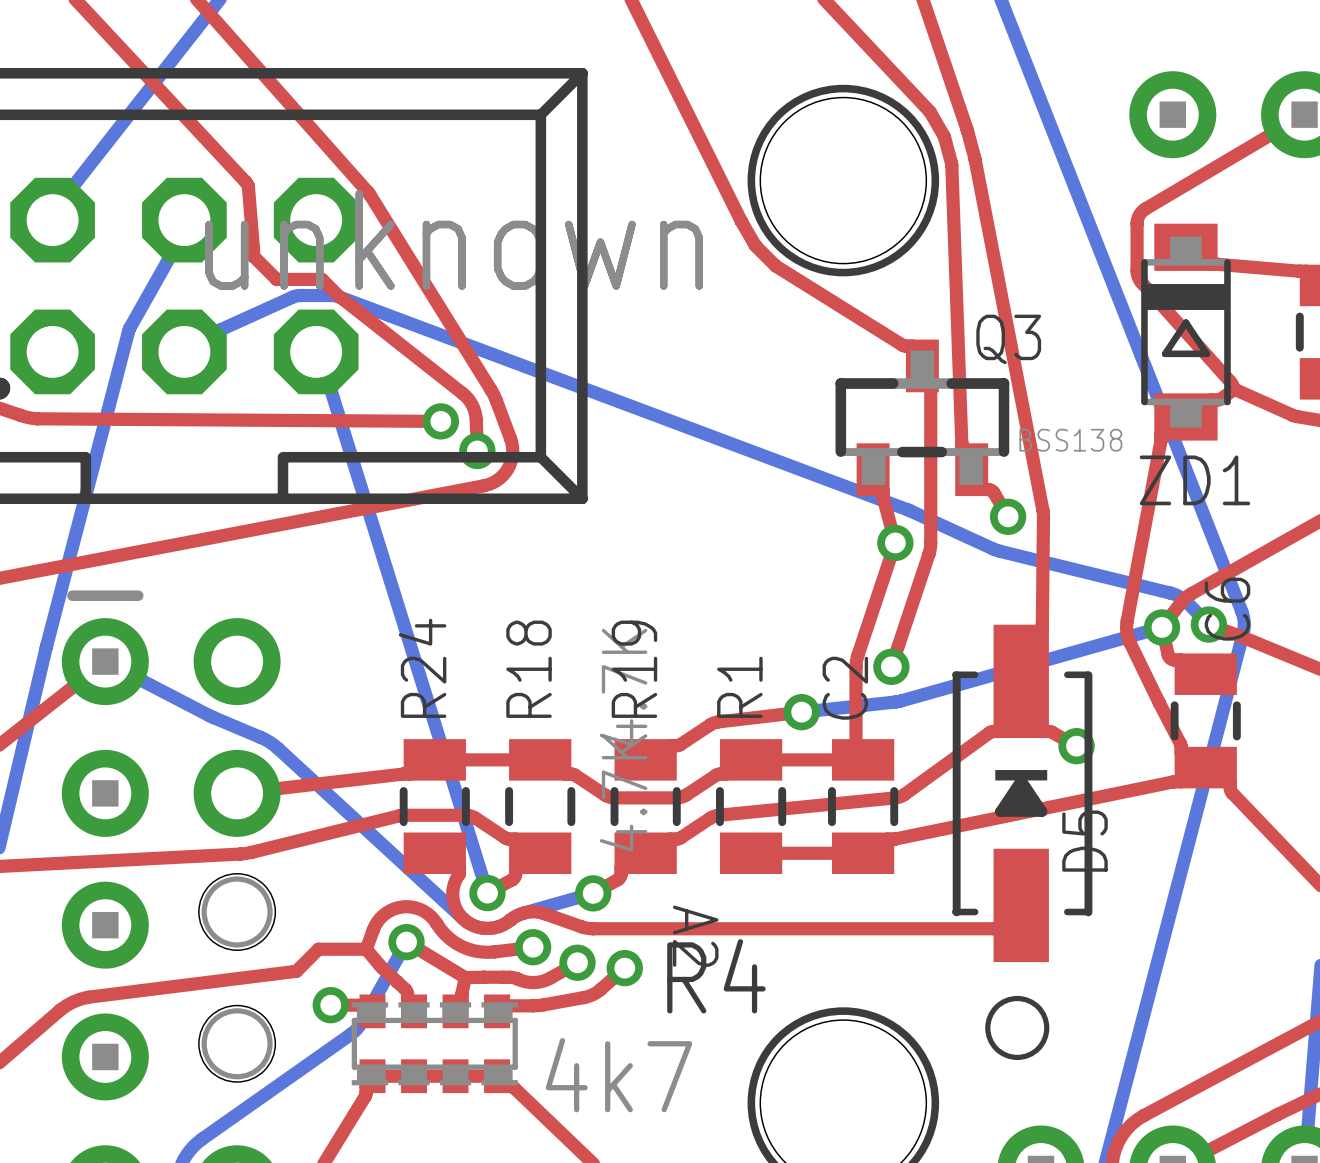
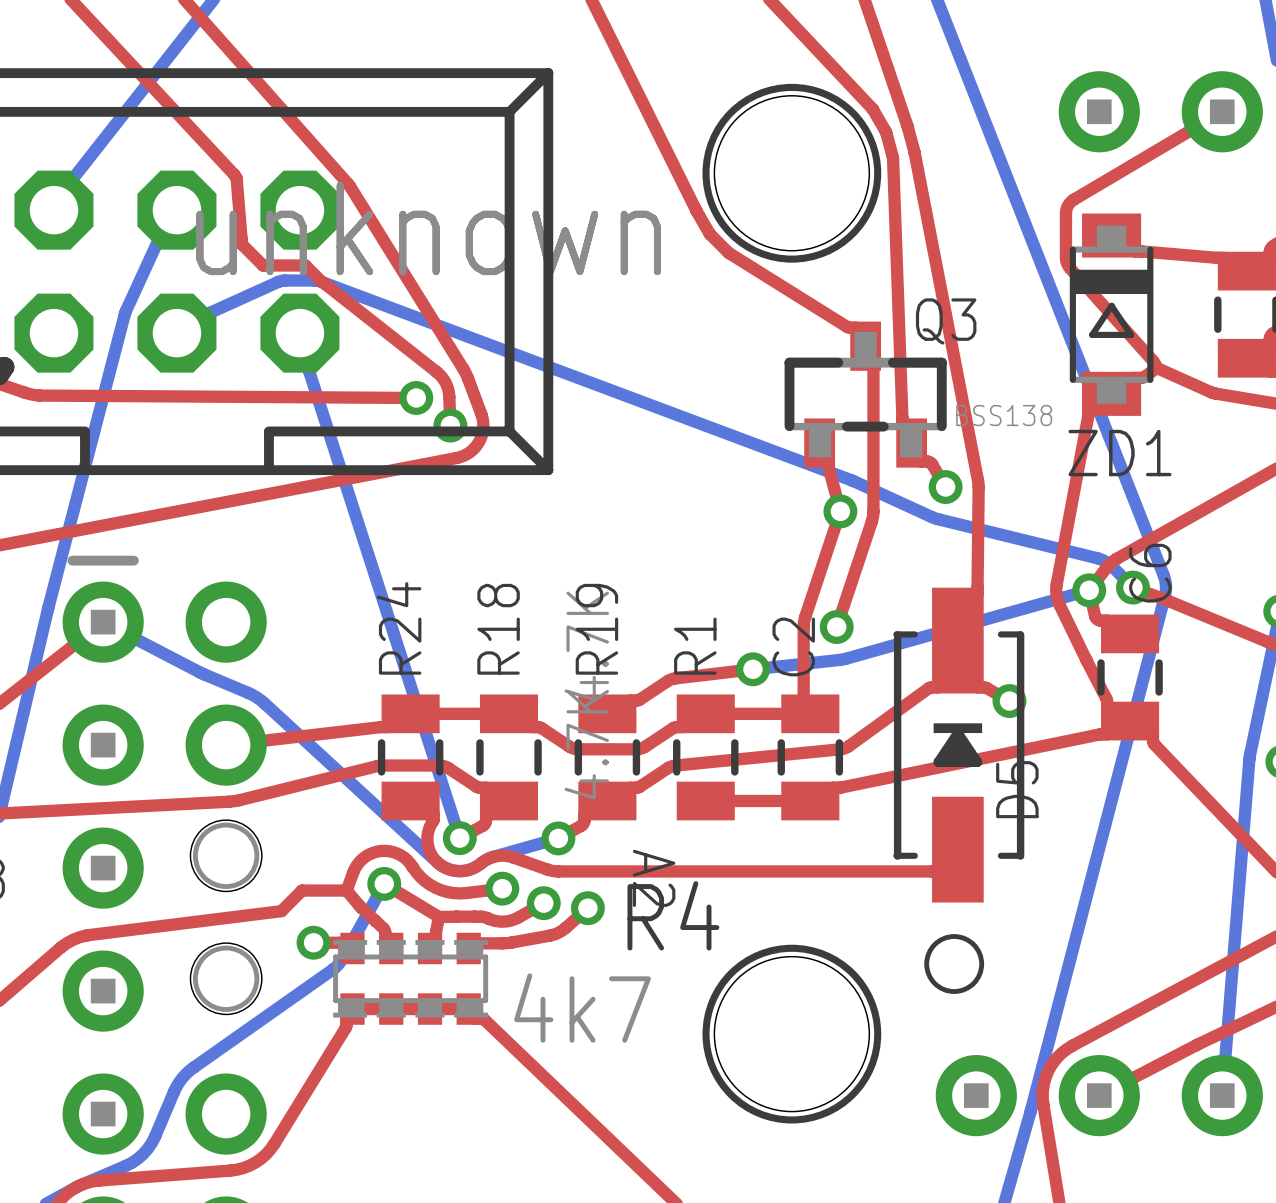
bottom track: (189, 221) (129, 328) -> (157, 242) (125, 311)
bottom track: (319, 351) (487, 893) -> (308, 369) (459, 838)

